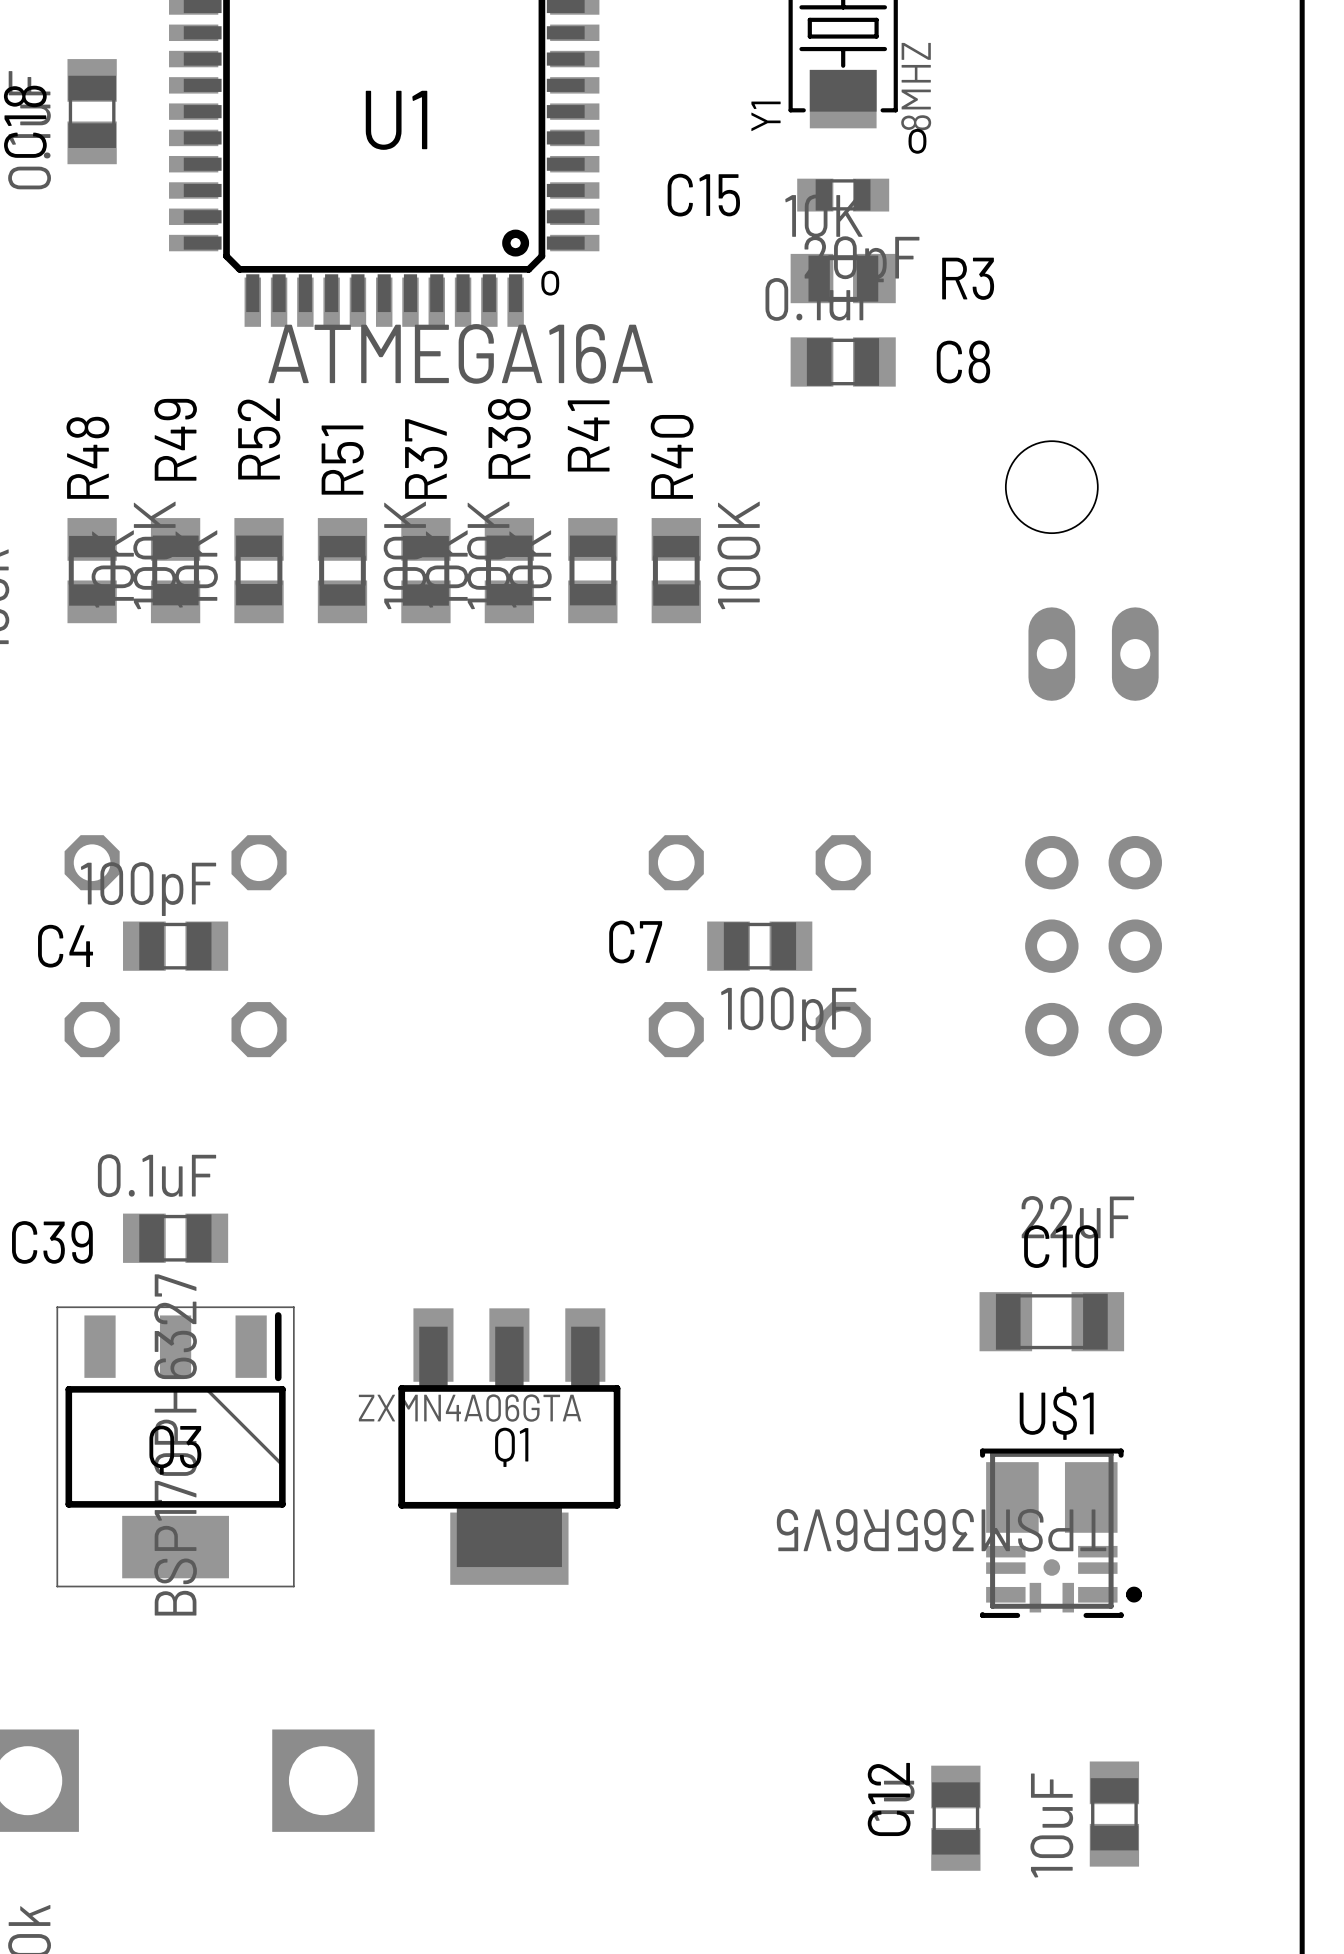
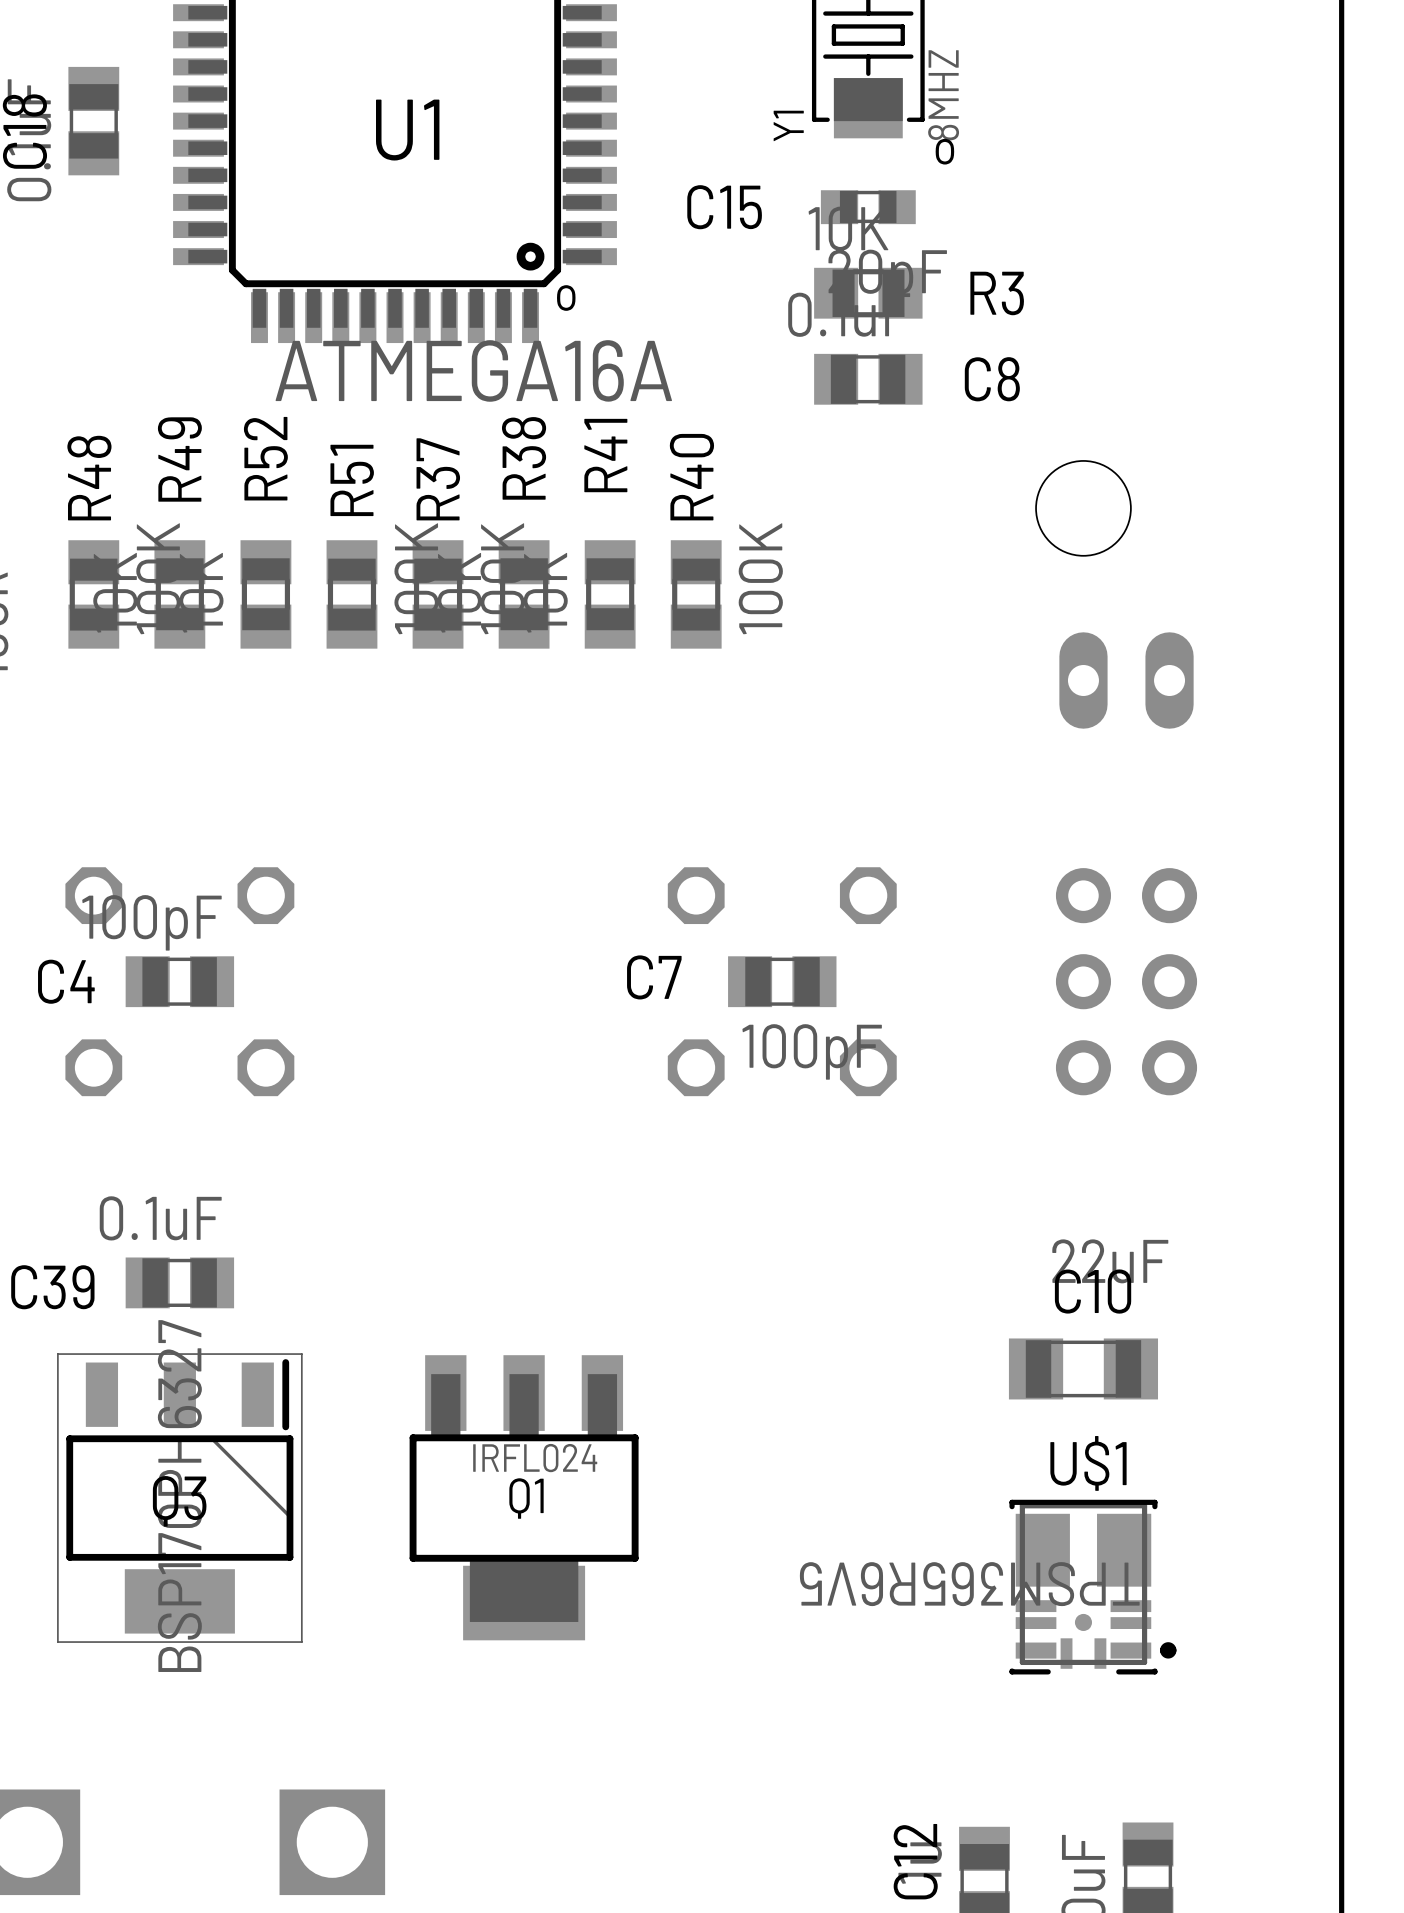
Q1 value: ZXMN4A06GTA (470, 1408) -> IRFL024 (535, 1458)

